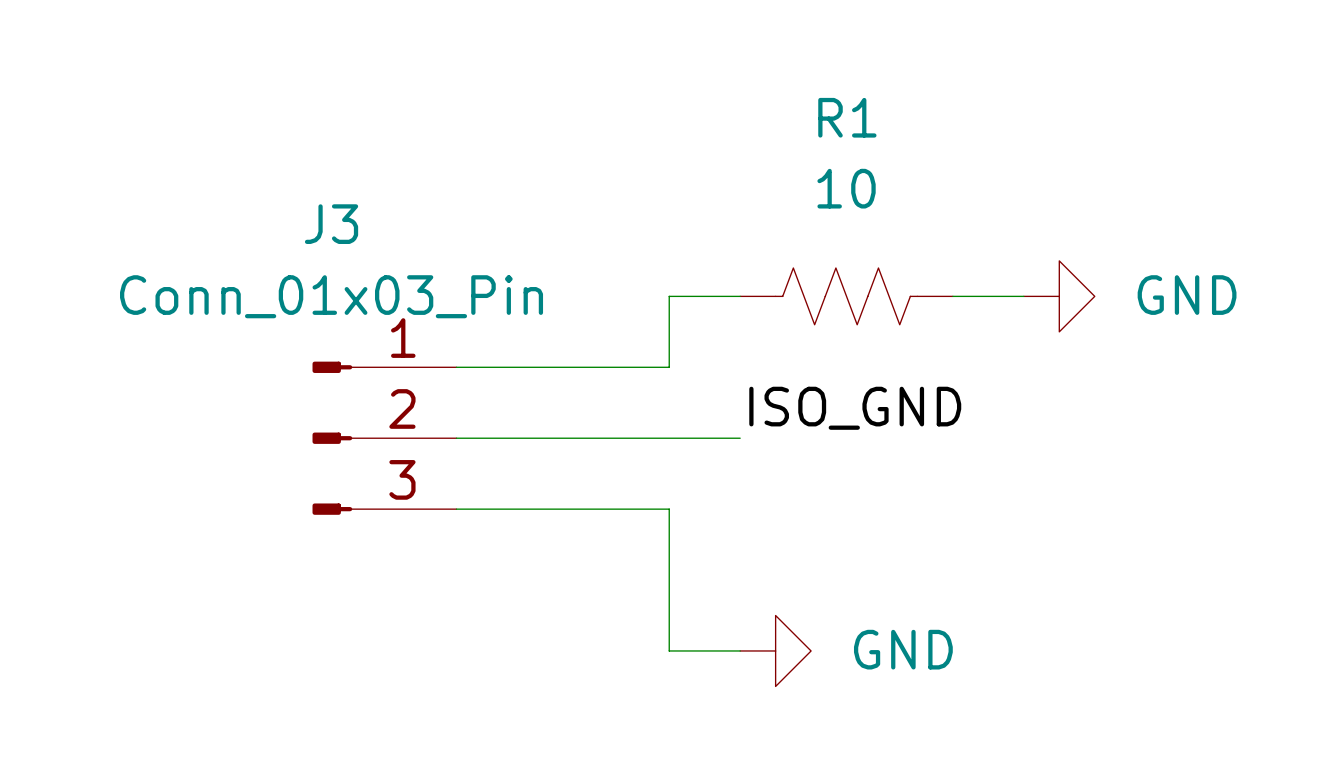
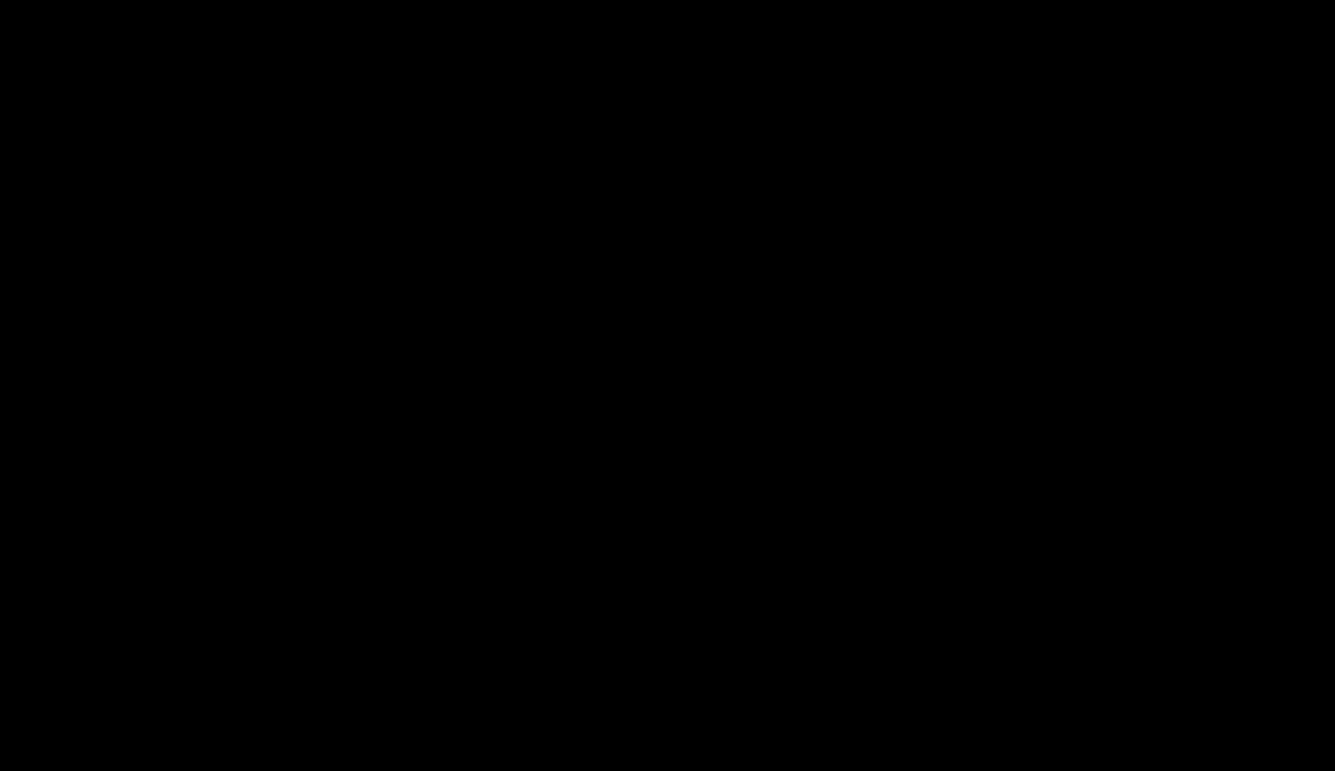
wire: (740, 296) (669, 296) (669, 367) (456, 367) -> none
R1: 10 (846, 296) -> none
wire: (952, 296) (1023, 296) -> none
power symbol: GND (1059, 296) -> none
label: ISO_GND (855, 408) -> none
J3: Conn_01x03_Pin (384, 438) -> none
wire: (456, 438) (740, 438) -> none
wire: (456, 509) (669, 509) (669, 650) (740, 650) -> none
power symbol: GND (775, 650) -> none

